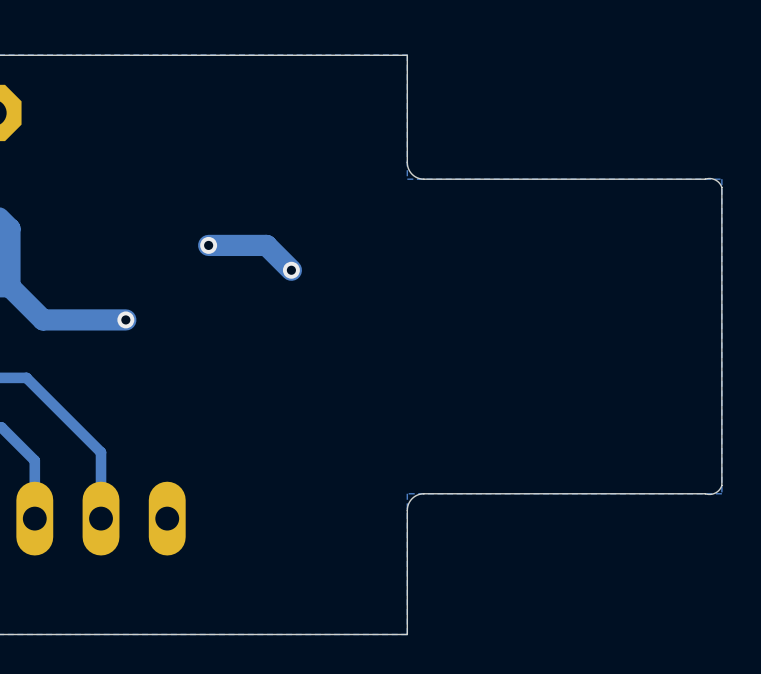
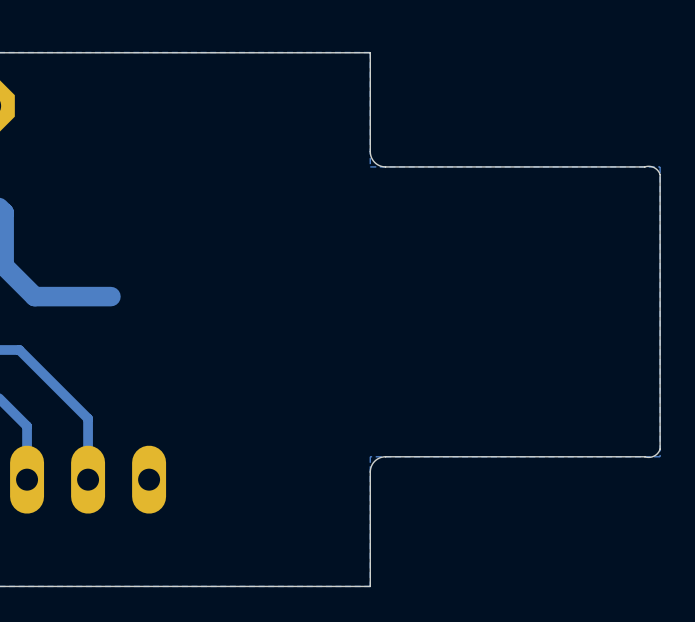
track: (208, 245) (266, 245) (291, 270) -> none
via: (208, 245) -> none
via: (291, 270) -> none
via: (125, 319) -> none

